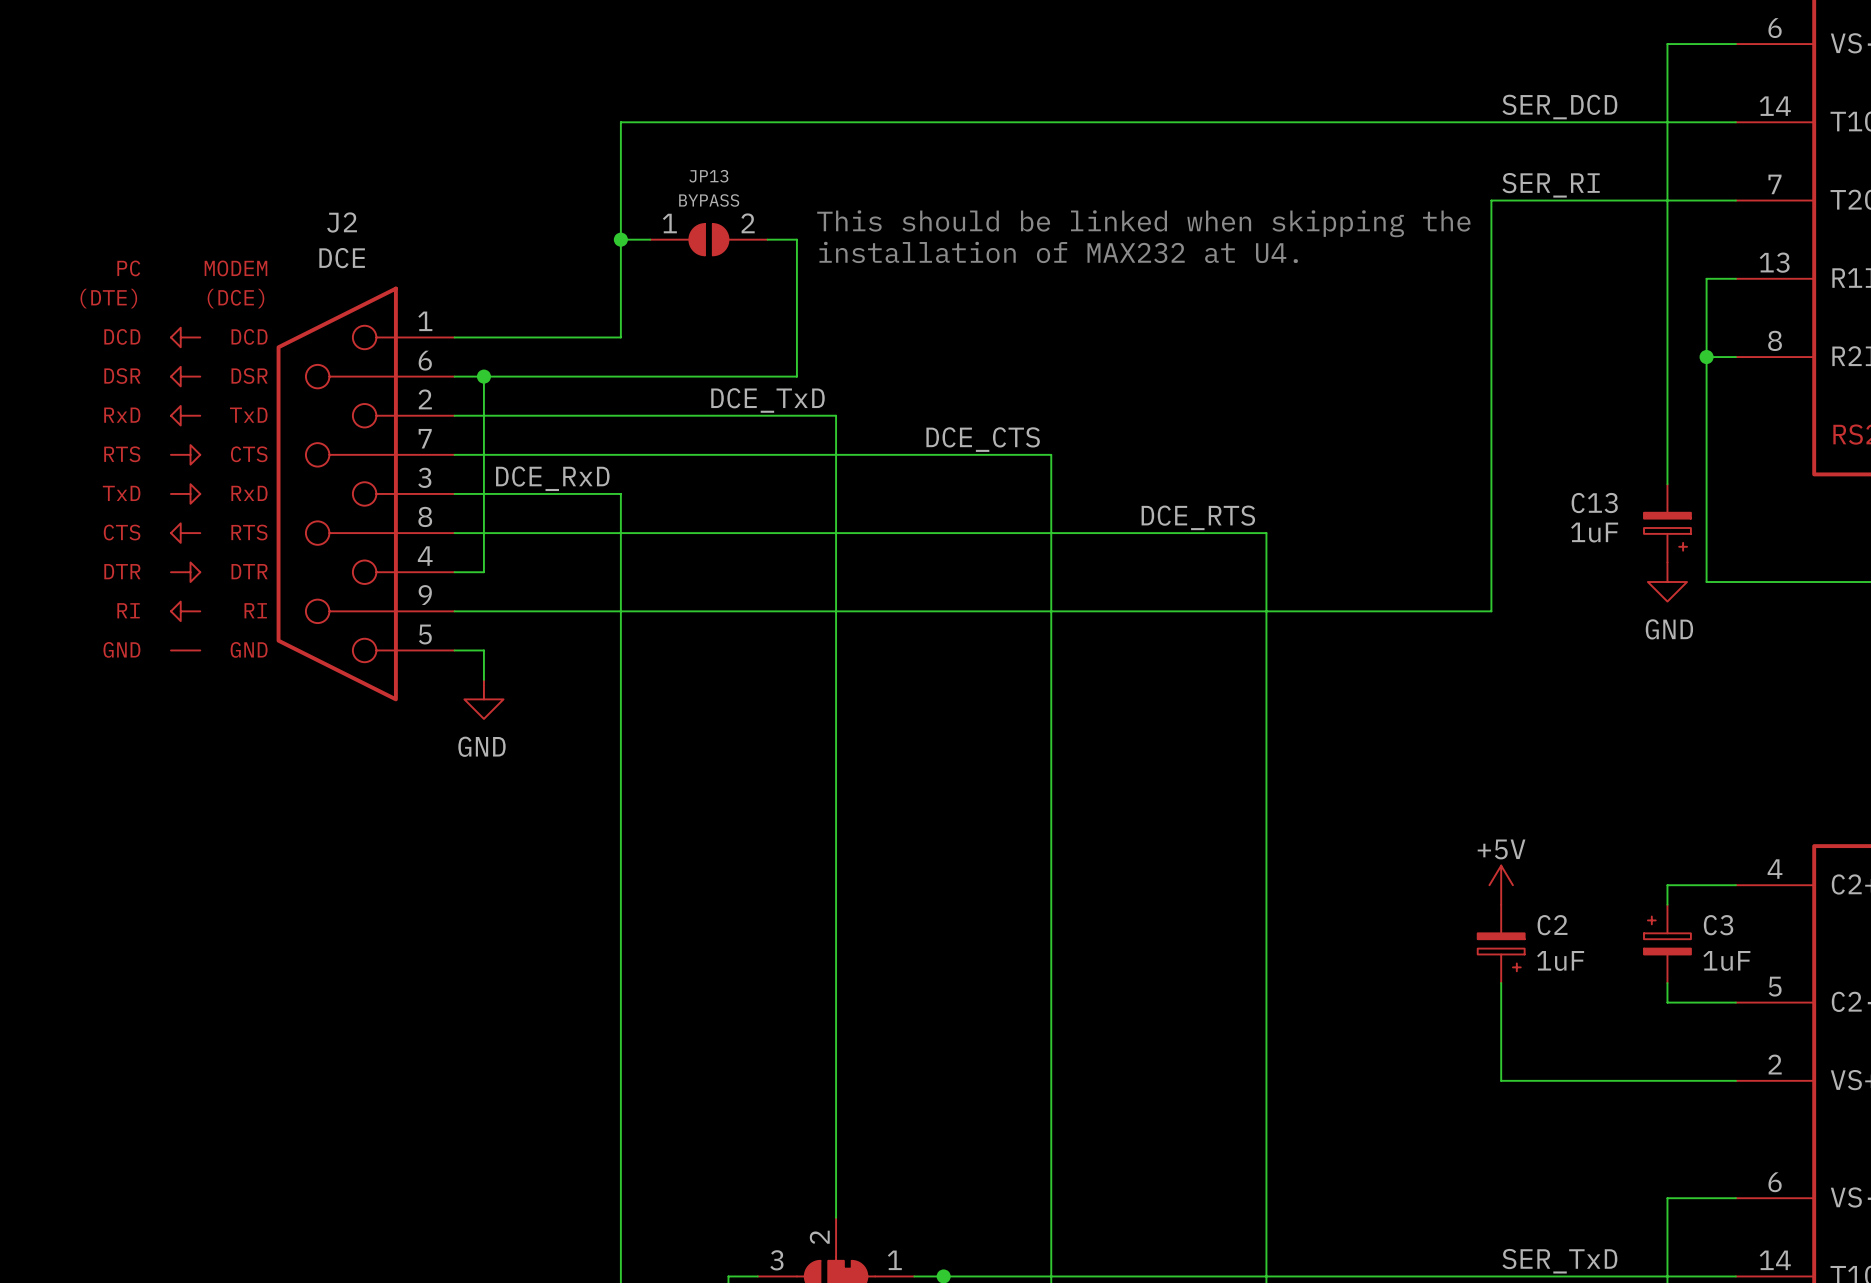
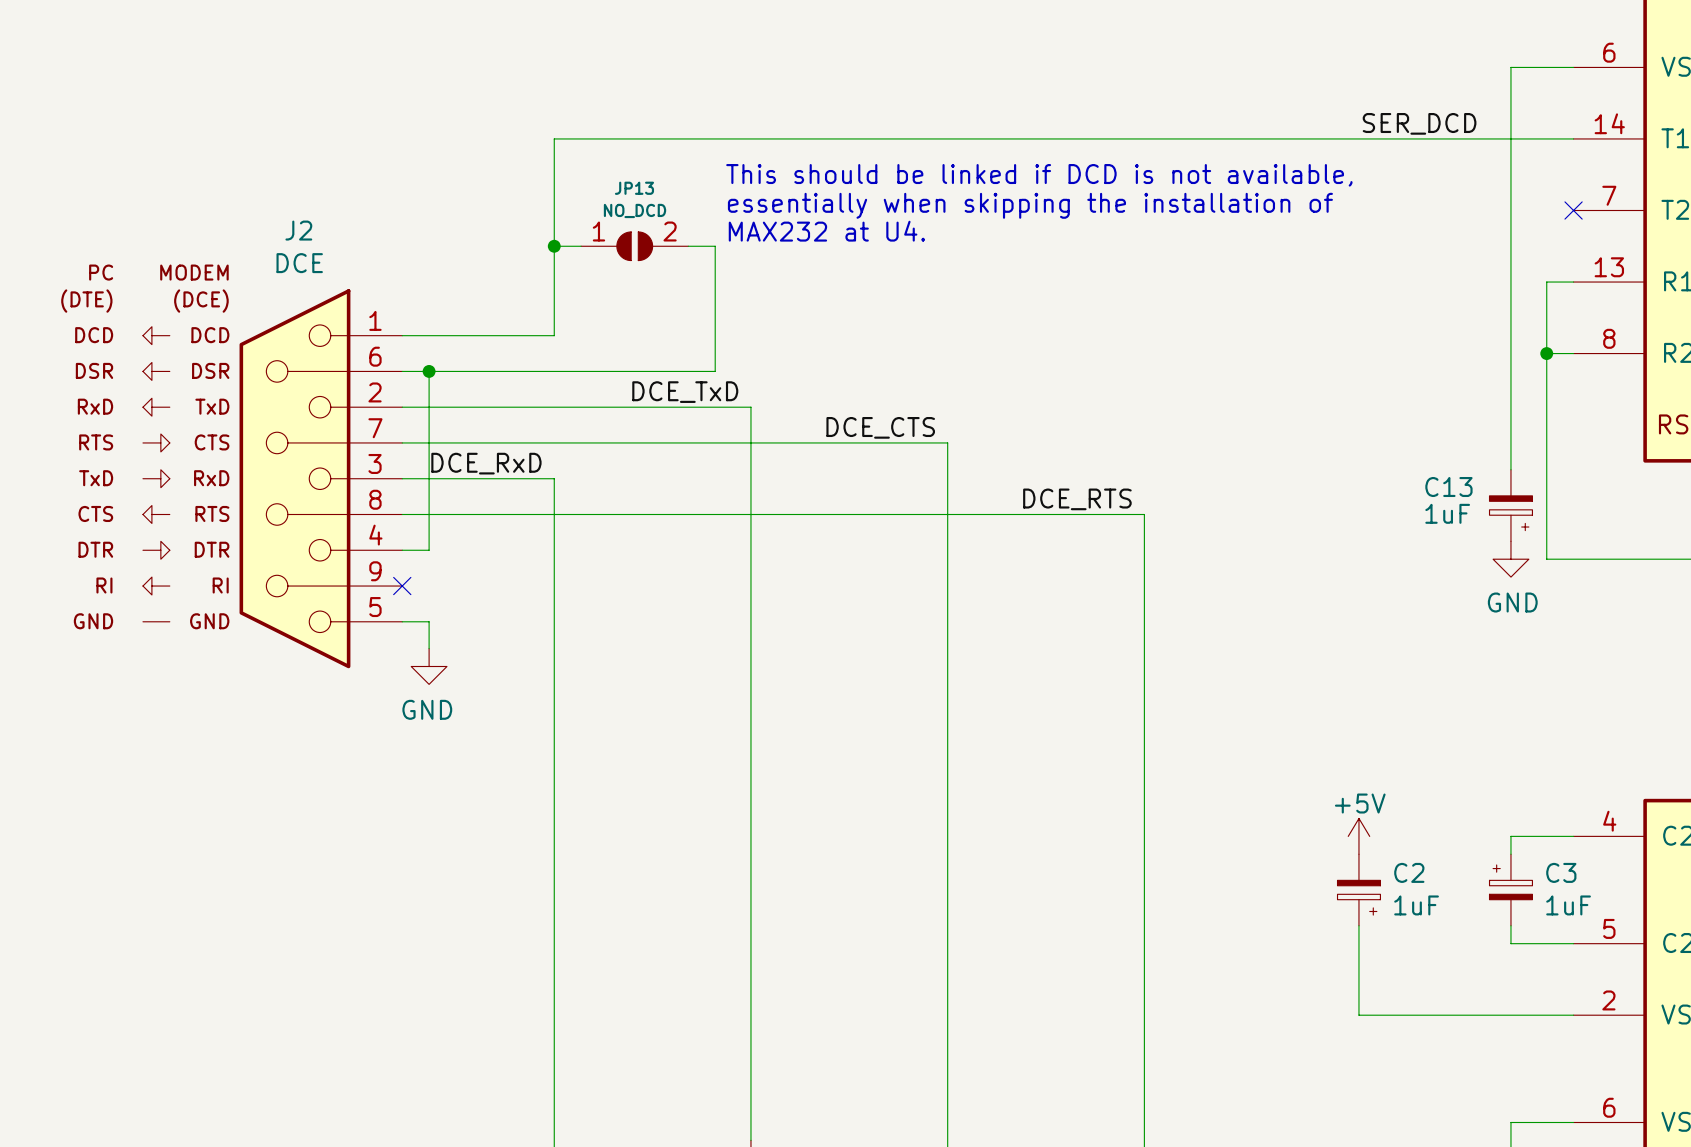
text: none -> This should be linked if DCD is not available, (1039, 175)
label: SER_RI (1551, 185) -> none
text: none -> essentially when skipping the installation of (1030, 205)
JP13 value: BYPASS (709, 200) -> NO_DCD (635, 210)
wire: (1735, 200) (1491, 200) (1491, 611) (454, 611) -> none
no-connect mark: none -> (1573, 210)
text: This should be linked when skipping the (1143, 223) -> MAX232 at U4. (826, 231)
text: installation of MAX232 at U4. (1058, 252) -> none
no-connect mark: none -> (402, 586)

